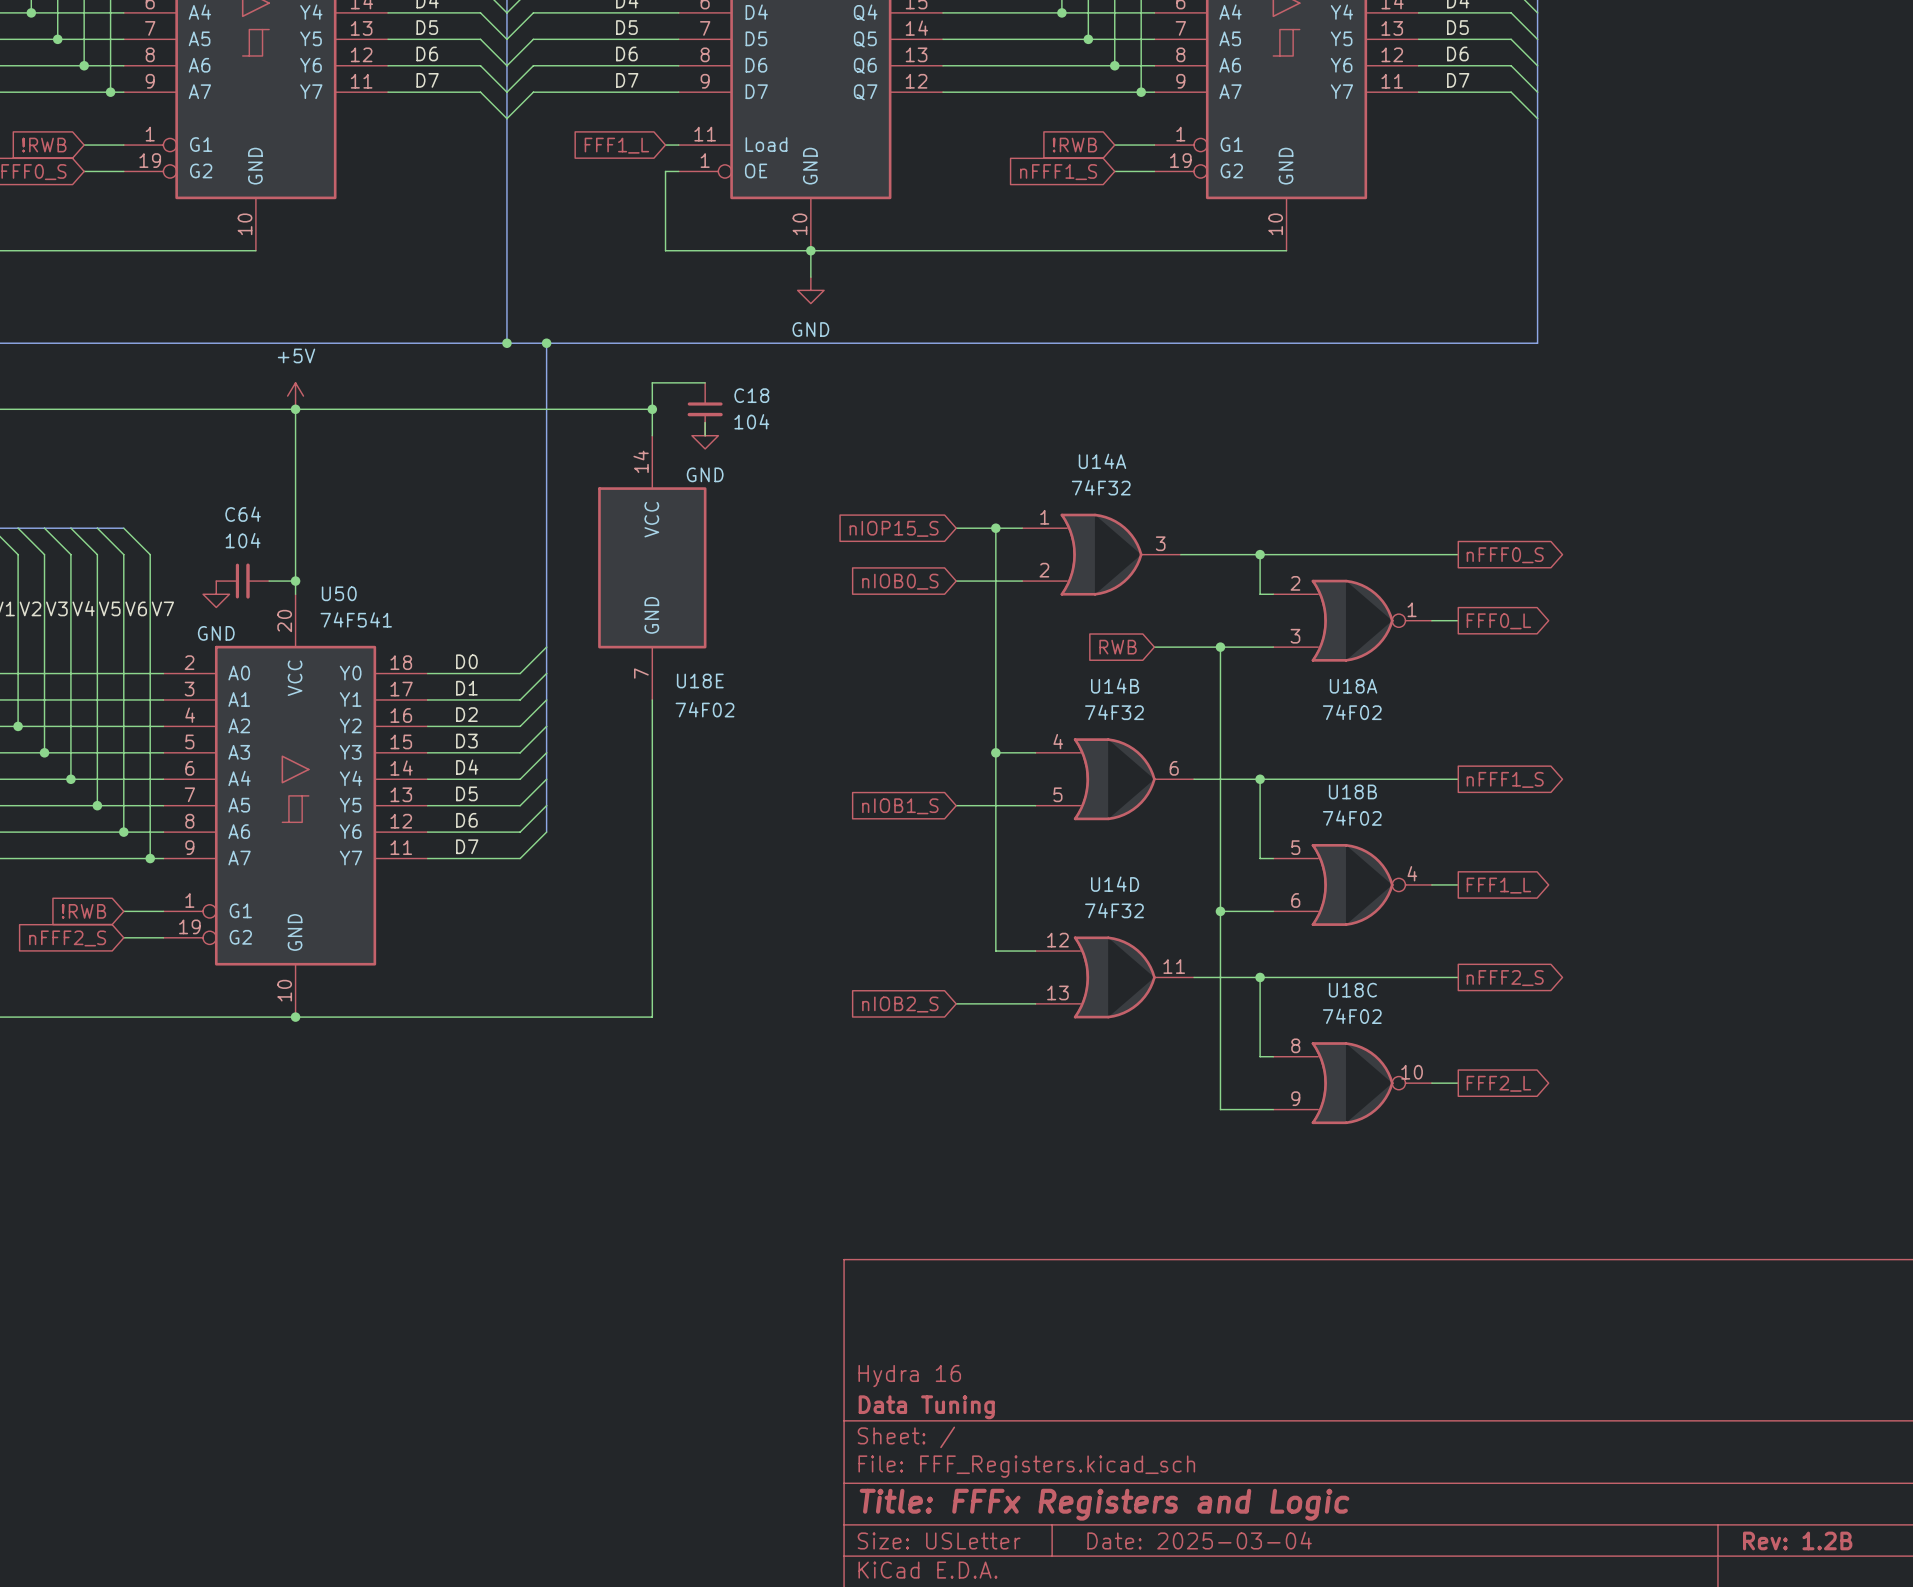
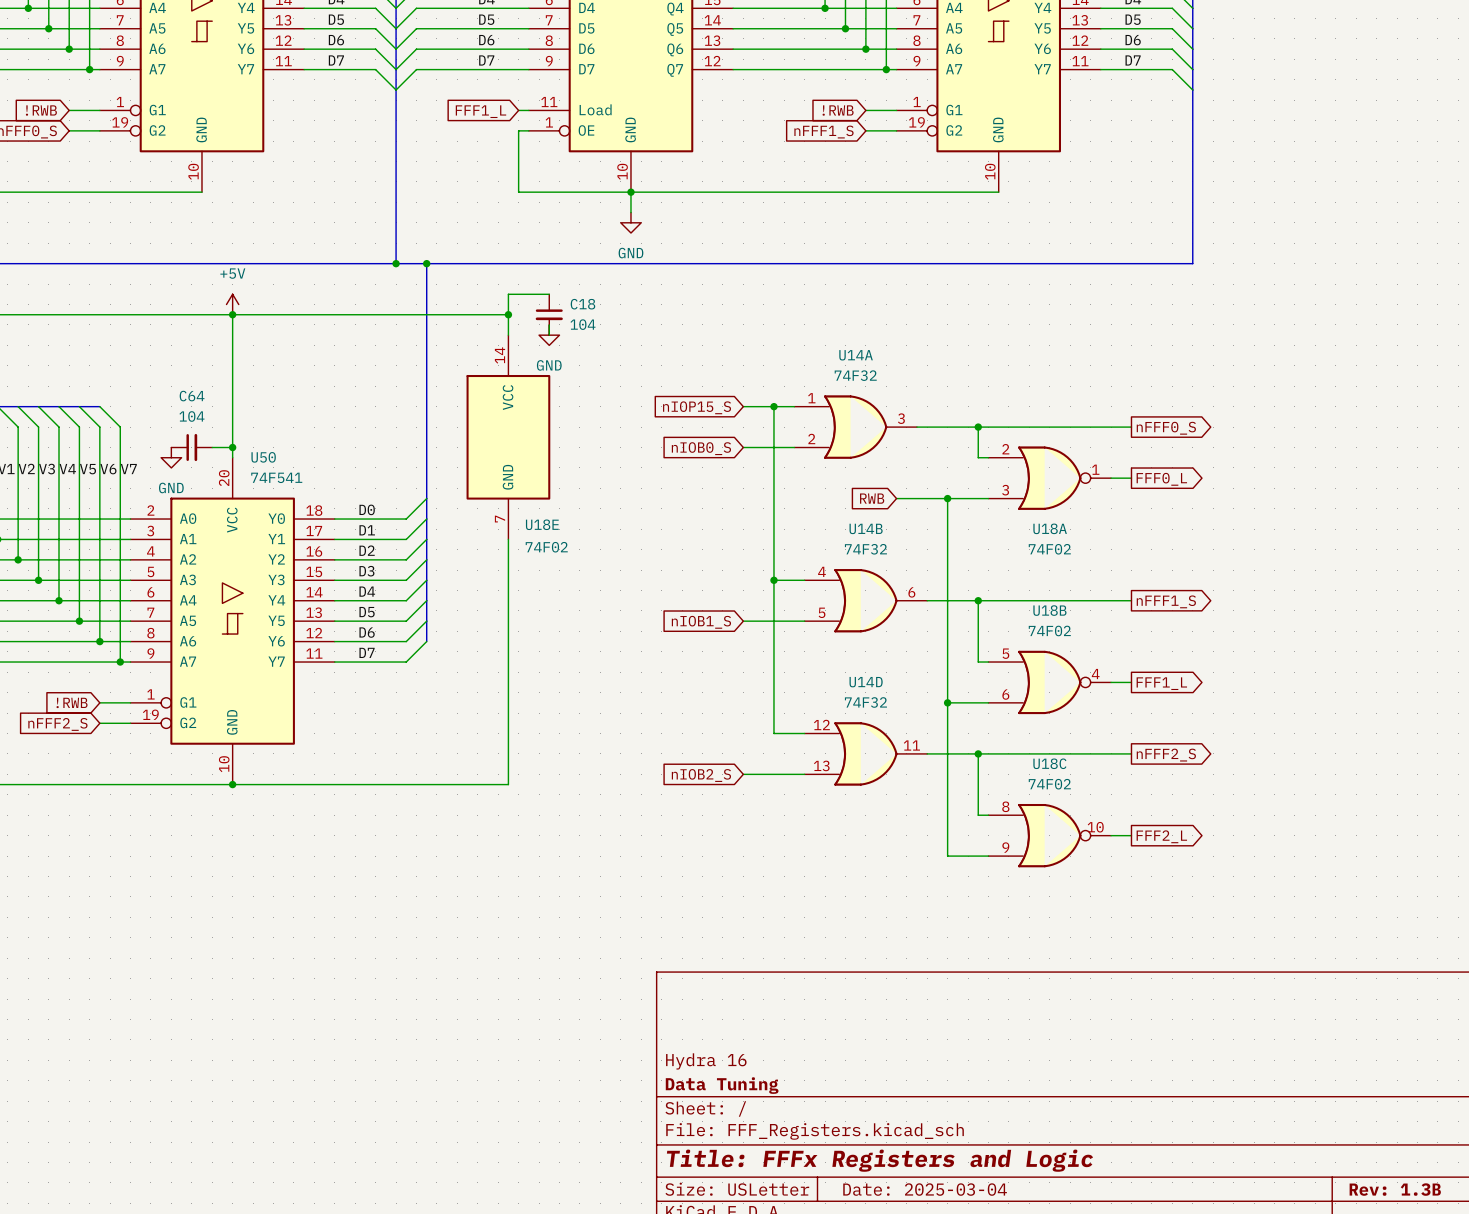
title block: Rev: 1.2B (1797, 1540) -> Rev: 1.3B (1395, 1189)

